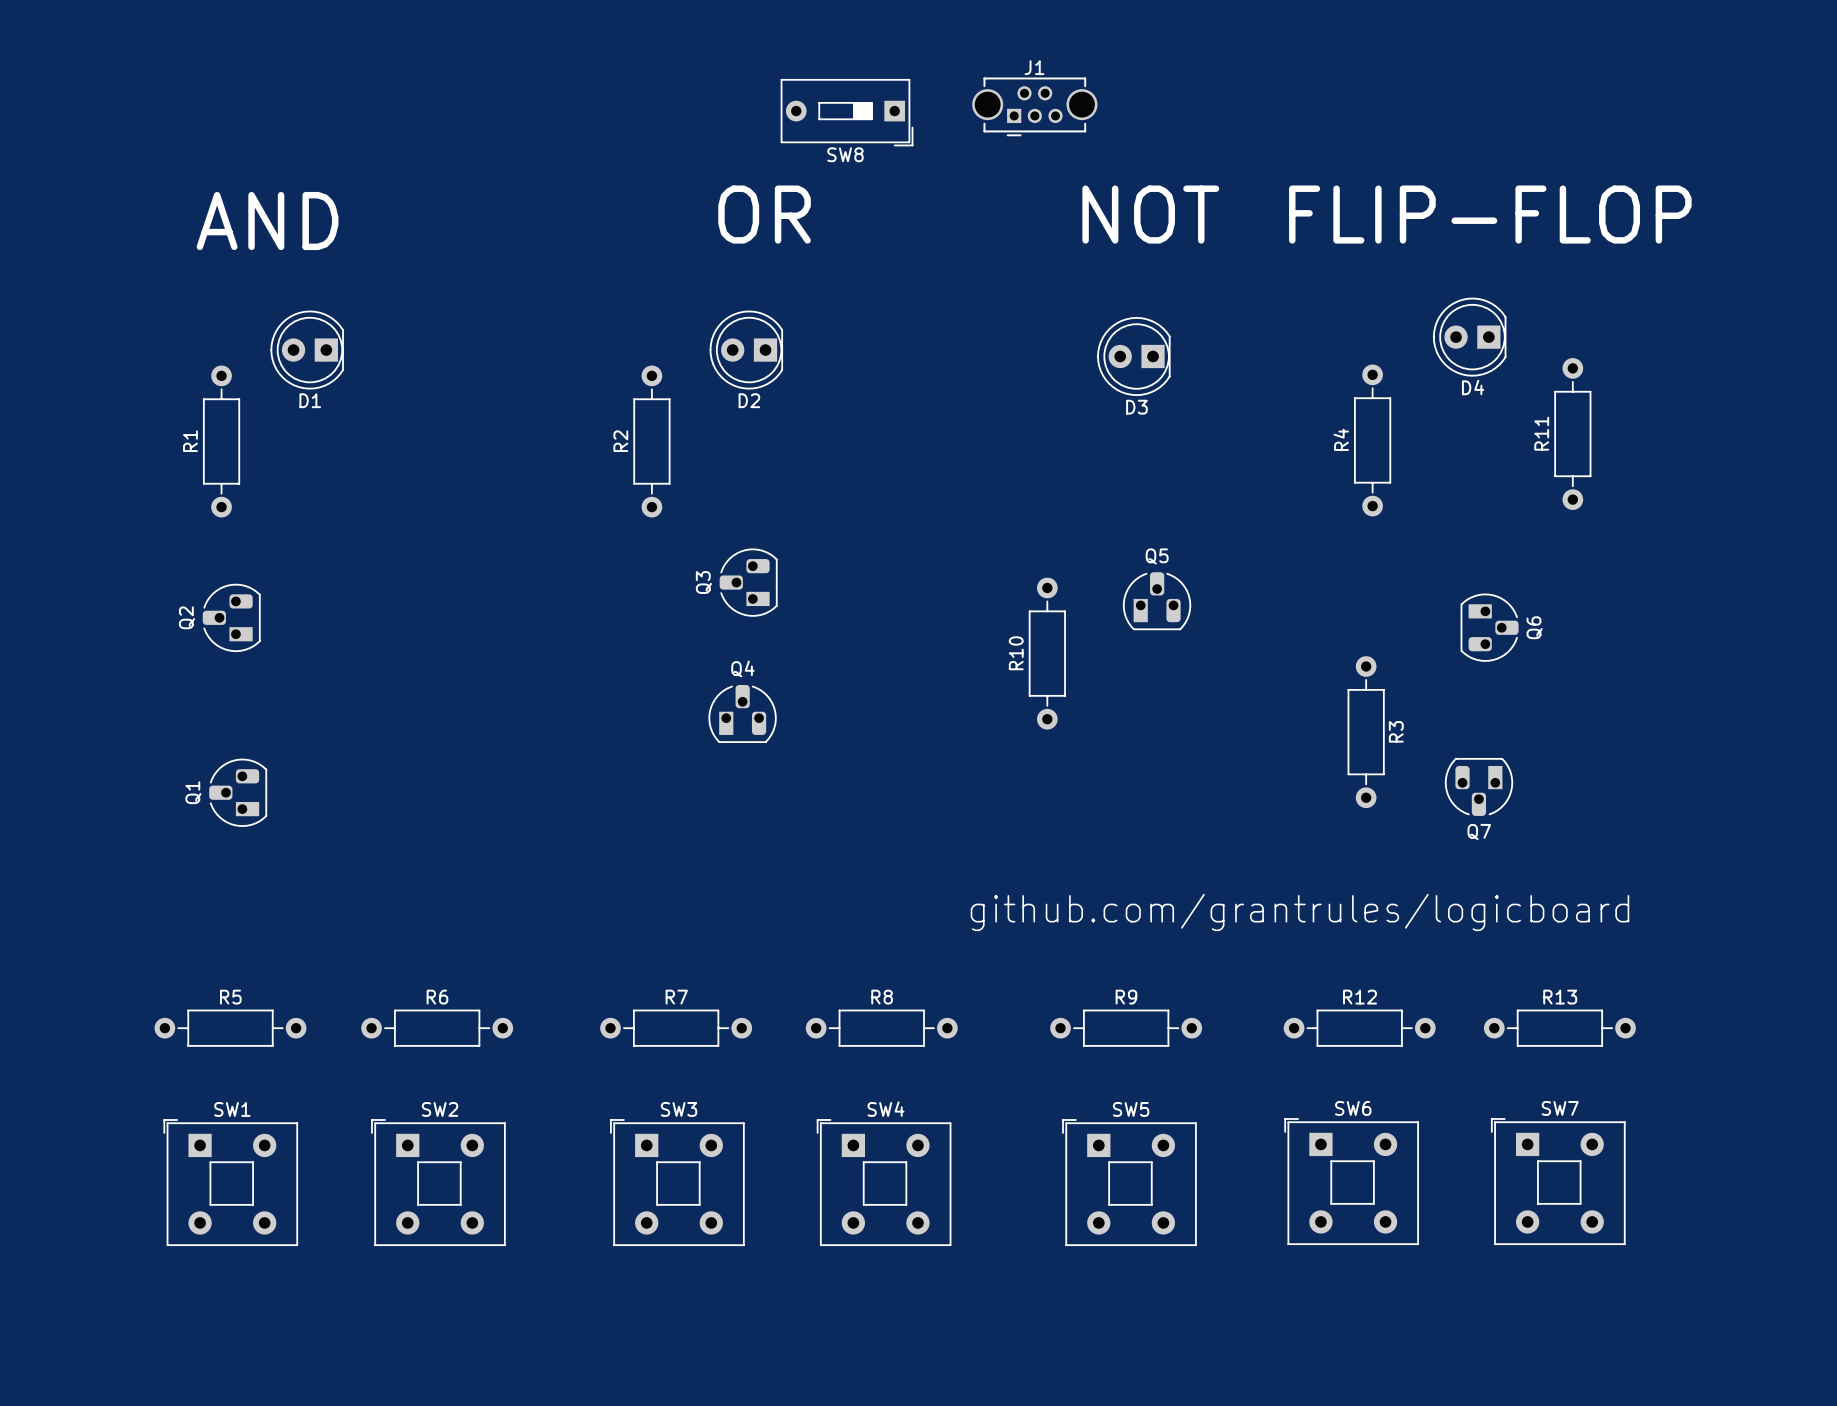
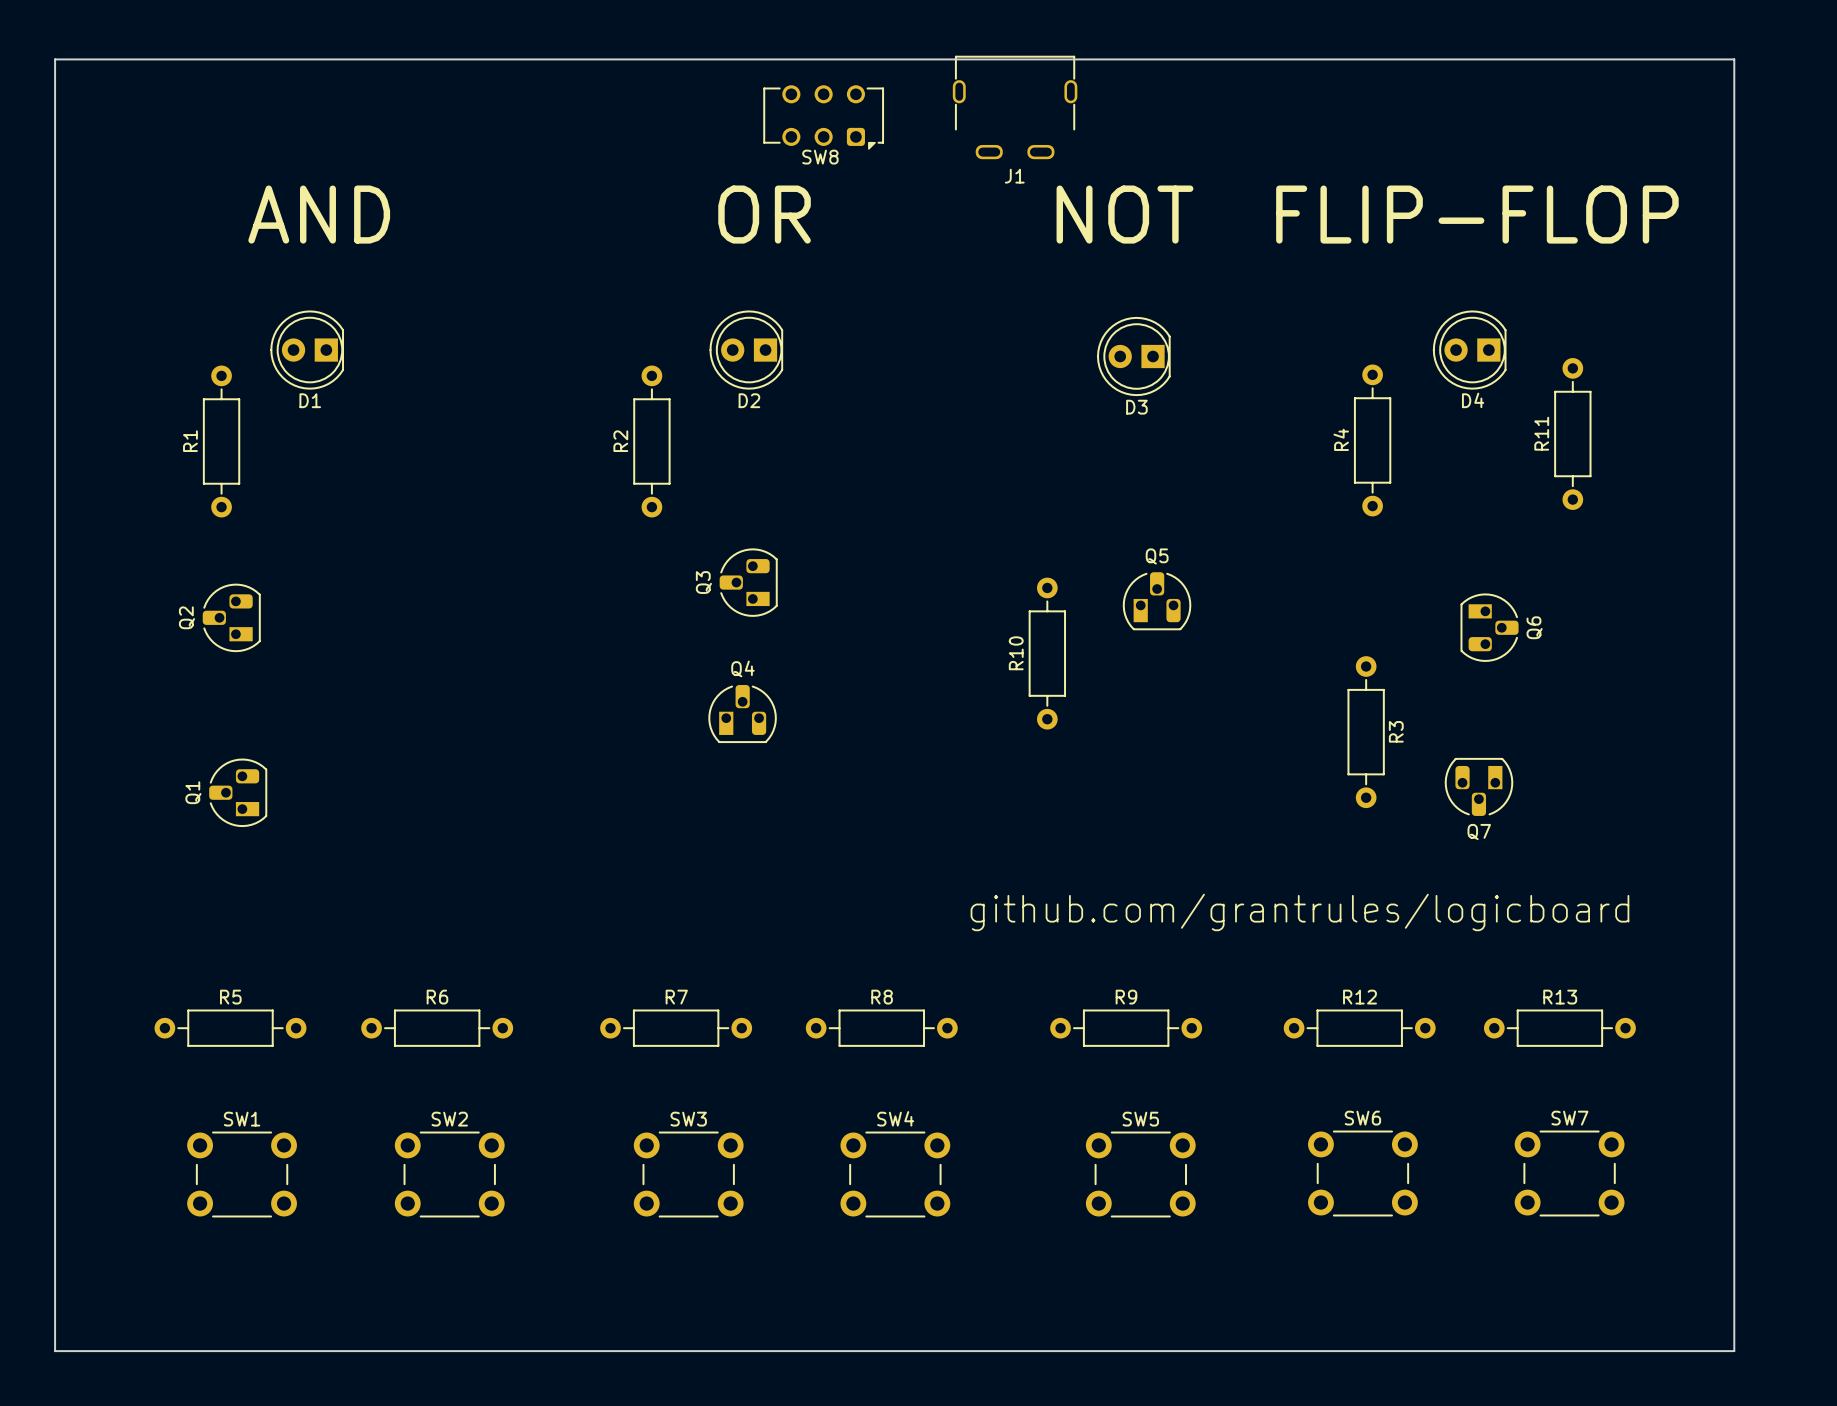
board edge: none -> (55, 59) (1734, 59) (1734, 1351) (55, 1351) (55, 59)
J1 name position: J1 (1034, 67) -> J1 (1014, 176)
J1 footprint: [972, 77, 1098, 137] -> [952, 55, 1078, 160]
SW8 footprint: [780, 79, 914, 147] -> [763, 85, 884, 150]
text position: NOT (1150, 214) -> NOT (1124, 214)
text position: FLIP-FLOP (1490, 214) -> FLIP-FLOP (1477, 214)
text position: AND (267, 221) -> AND (319, 214)
D4 position: (1469, 337) -> (1469, 350)
SW6 footprint: [1284, 1118, 1419, 1245] -> [1308, 1130, 1418, 1217]
SW7 footprint: [1491, 1118, 1626, 1245] -> [1514, 1130, 1625, 1217]
SW1 footprint: [163, 1119, 298, 1246] -> [187, 1131, 297, 1218]
SW2 footprint: [371, 1119, 506, 1246] -> [394, 1131, 505, 1218]
SW3 footprint: [610, 1119, 745, 1246] -> [633, 1131, 744, 1218]
SW4 footprint: [816, 1119, 952, 1246] -> [840, 1131, 951, 1218]
SW5 footprint: [1062, 1119, 1197, 1246] -> [1085, 1131, 1196, 1218]

